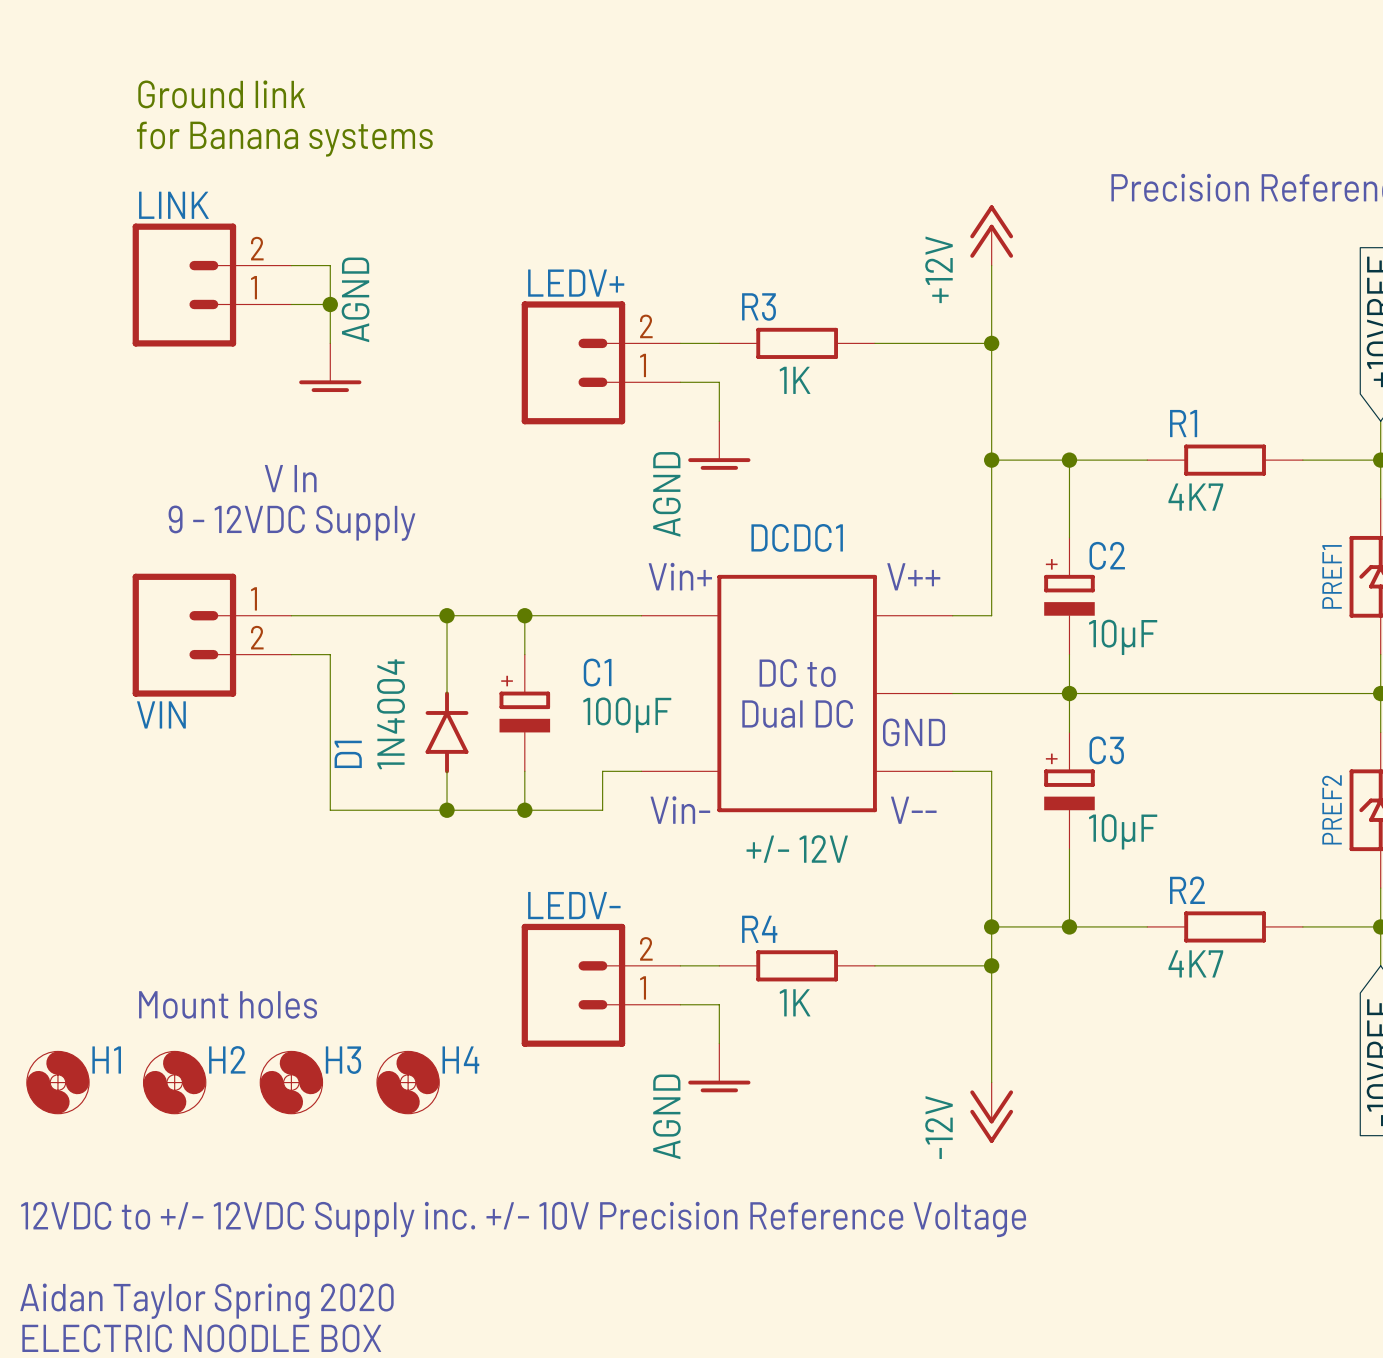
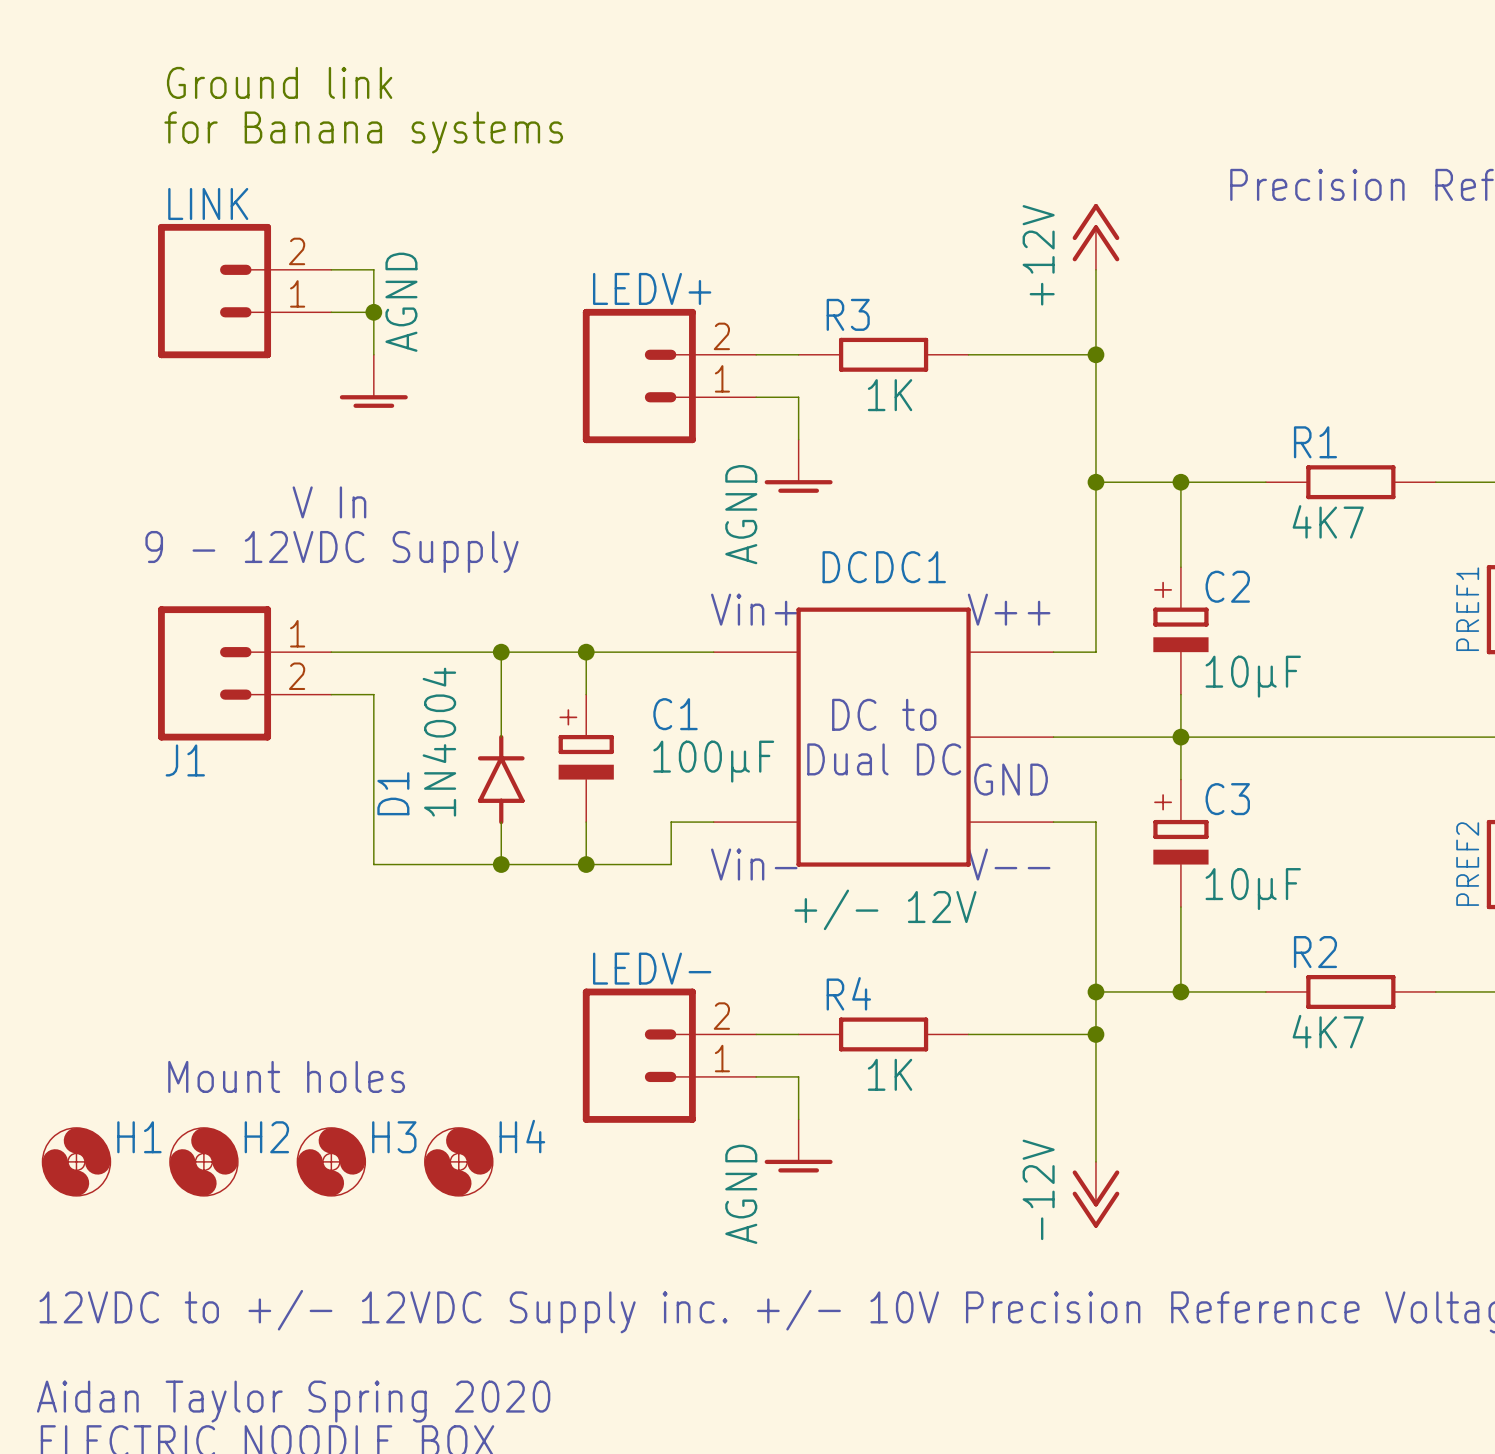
VIN name: VIN (161, 714) -> J1 (185, 760)

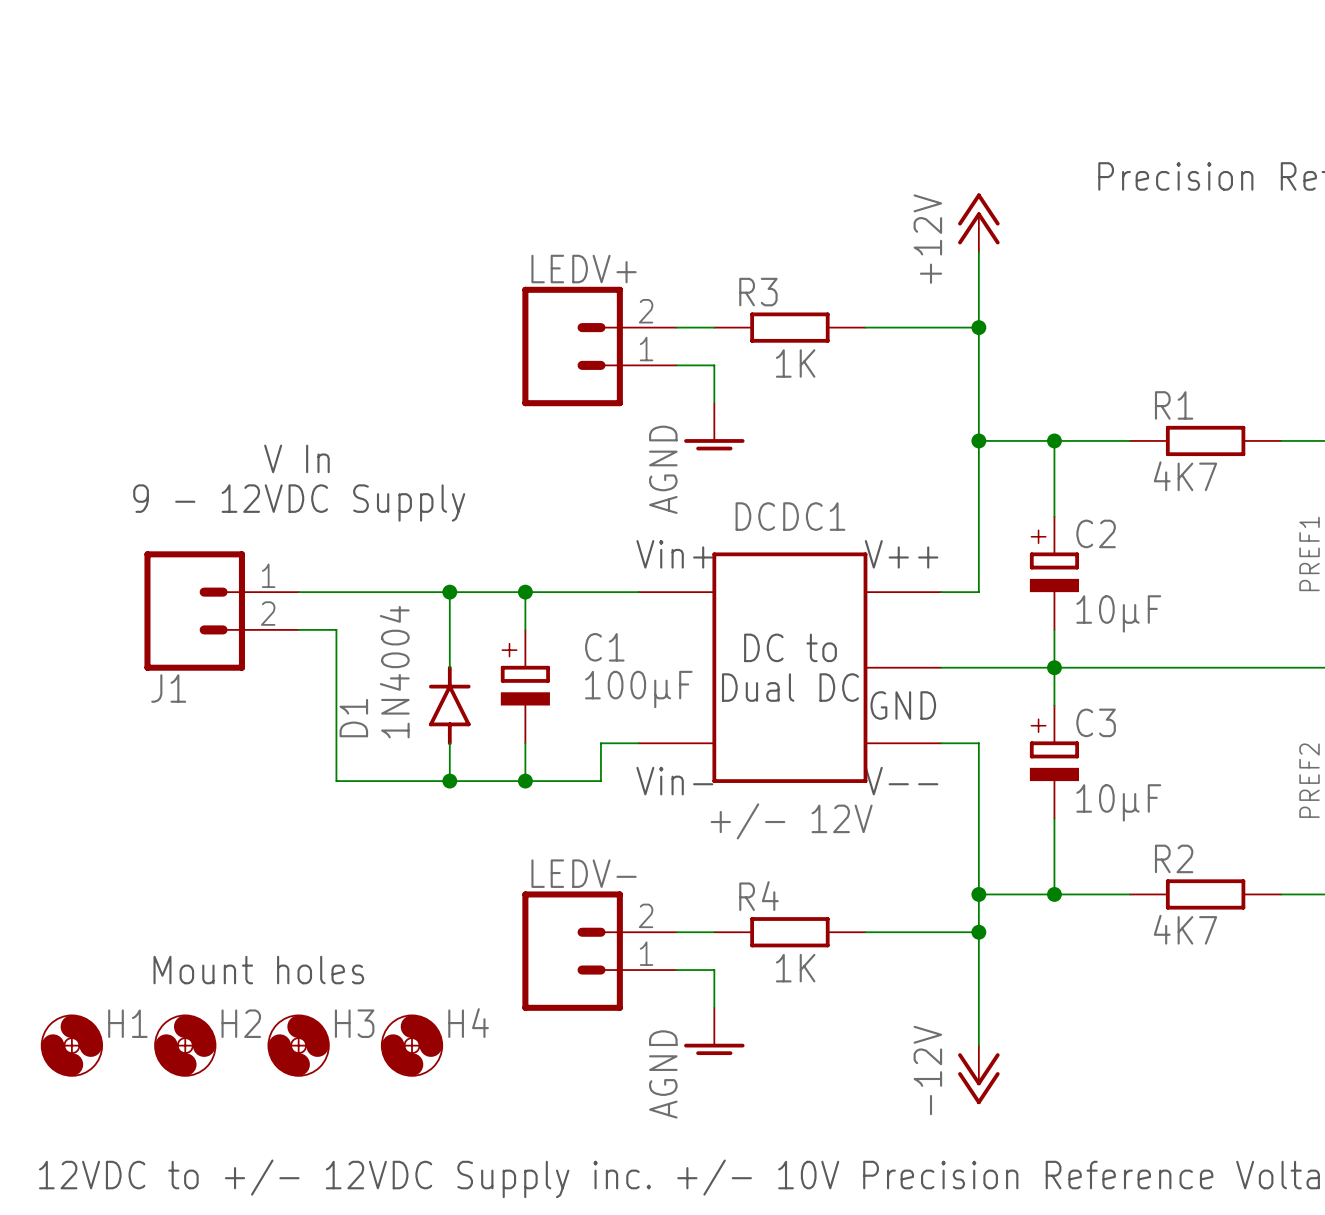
text: Ground link (279, 82) -> none
text: for Banana systems (363, 132) -> none
wire: (331, 269) (373, 269) (373, 354) -> none
LINK: (244, 291) -> none
wire: (331, 312) (373, 312) -> none
junction: (373, 312) -> none
power symbol: AGND (373, 381) -> none

